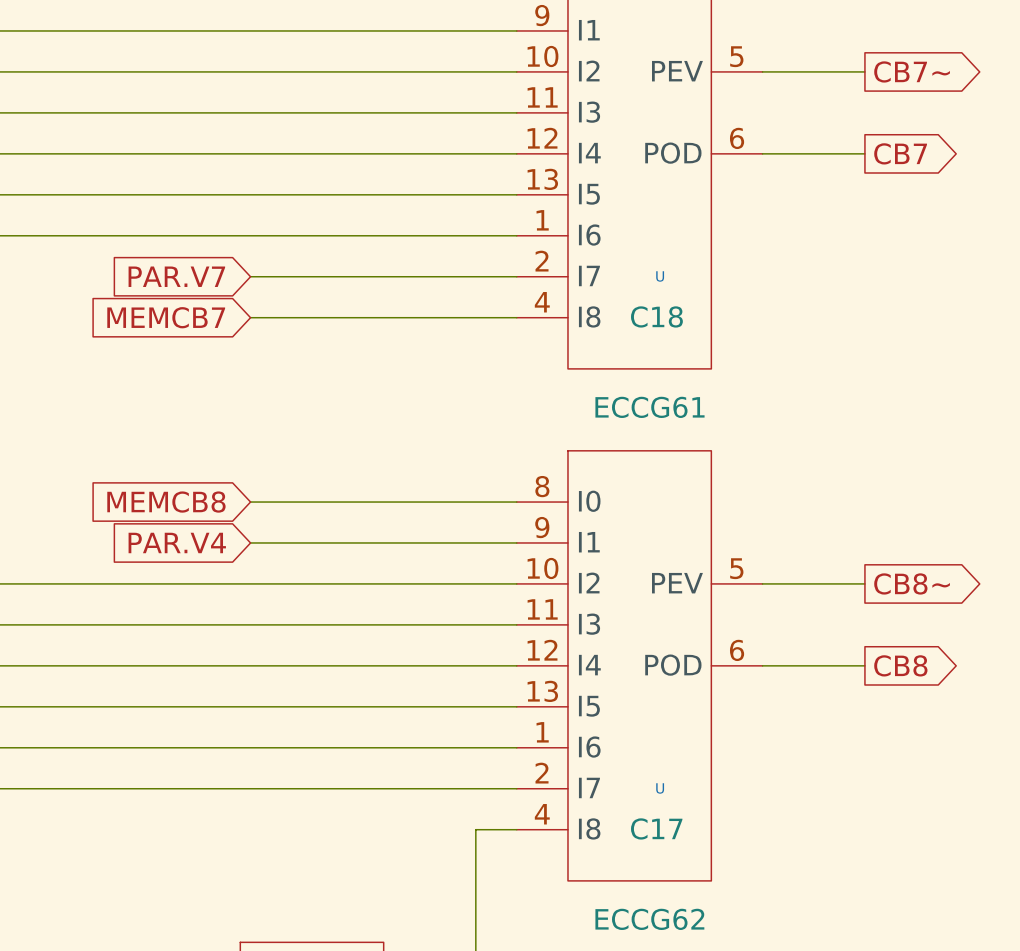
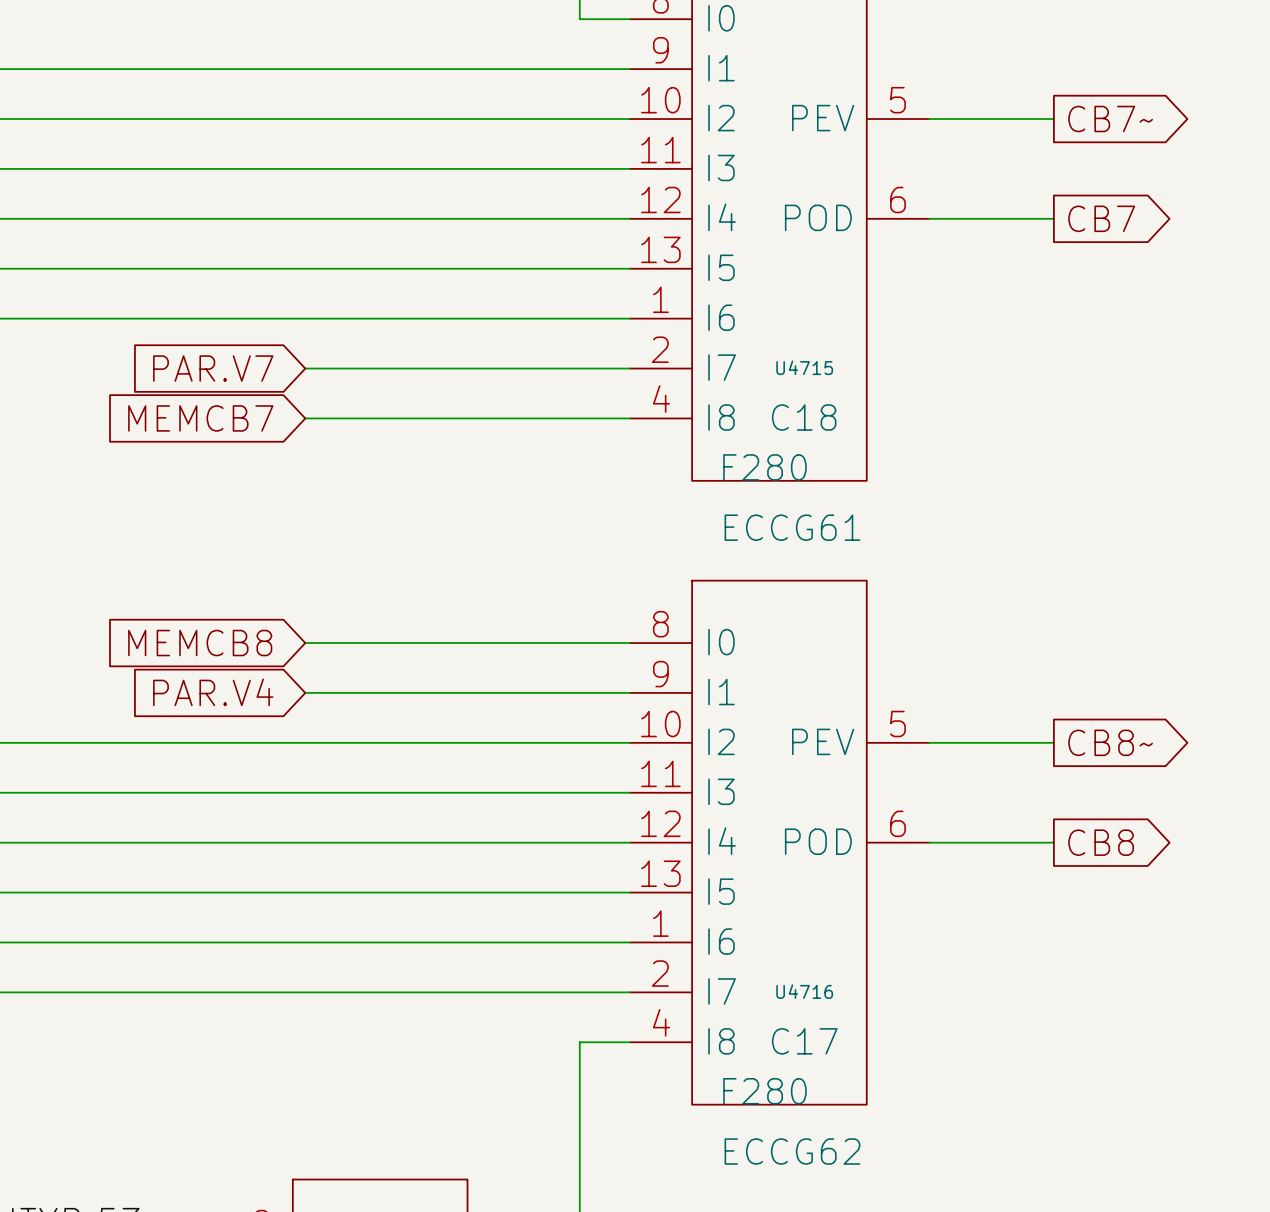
U name: U (660, 276) -> U4715 (804, 367)
U value: none -> F280 (764, 467)
U name: U (660, 788) -> U4716 (804, 991)
U value: none -> F280 (764, 1091)

